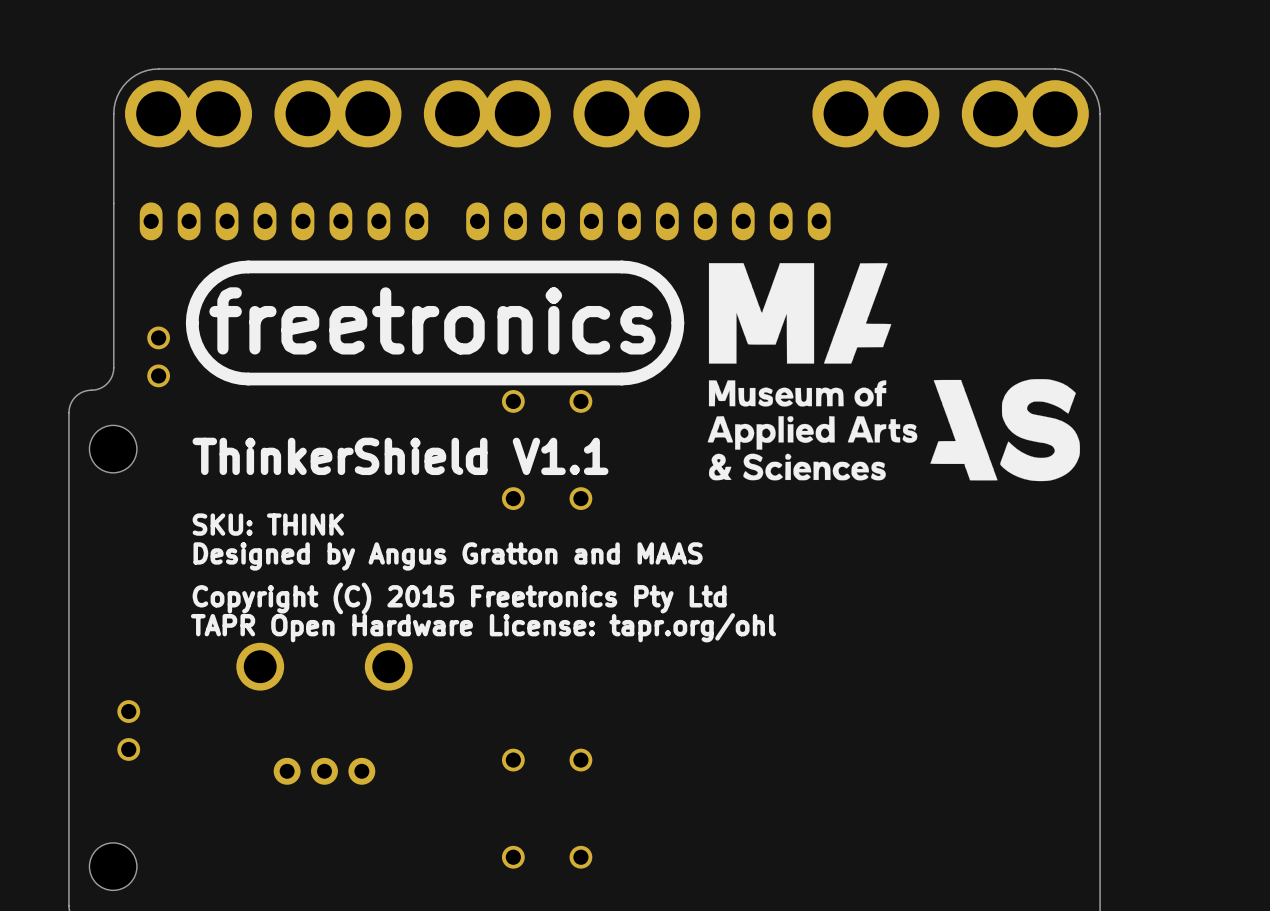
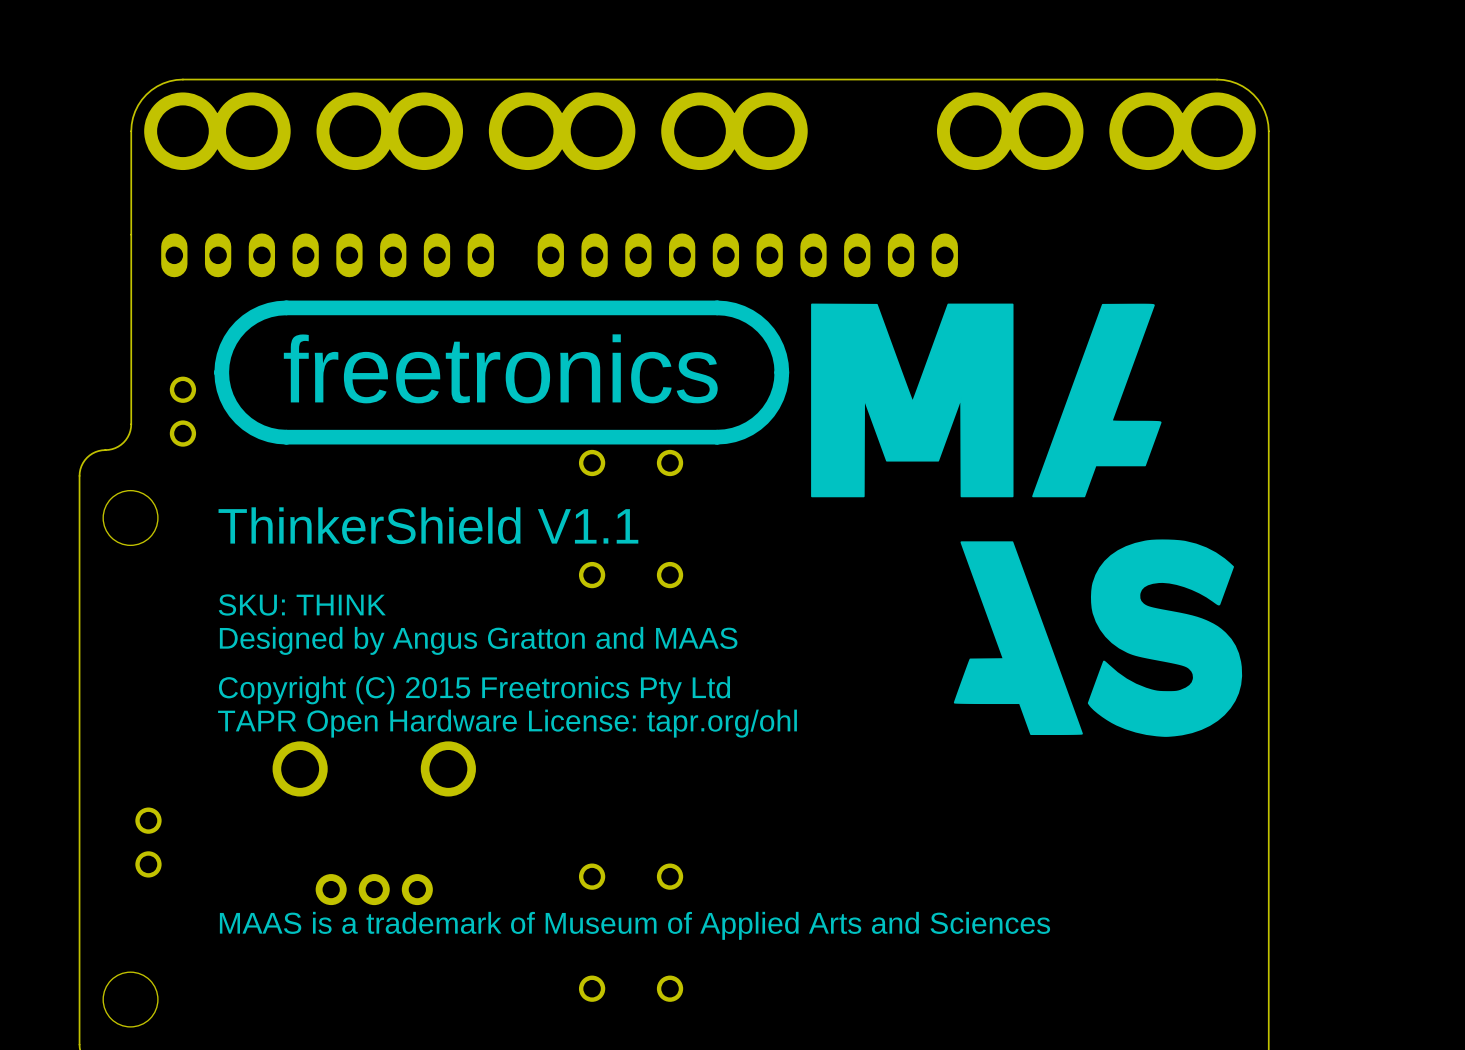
drawing: none -> [811, 303, 1243, 737]
drawing: [707, 263, 1080, 482] -> none
text: none -> MAAS is a trademark of Museum of Applied Arts and Sciences (634, 925)

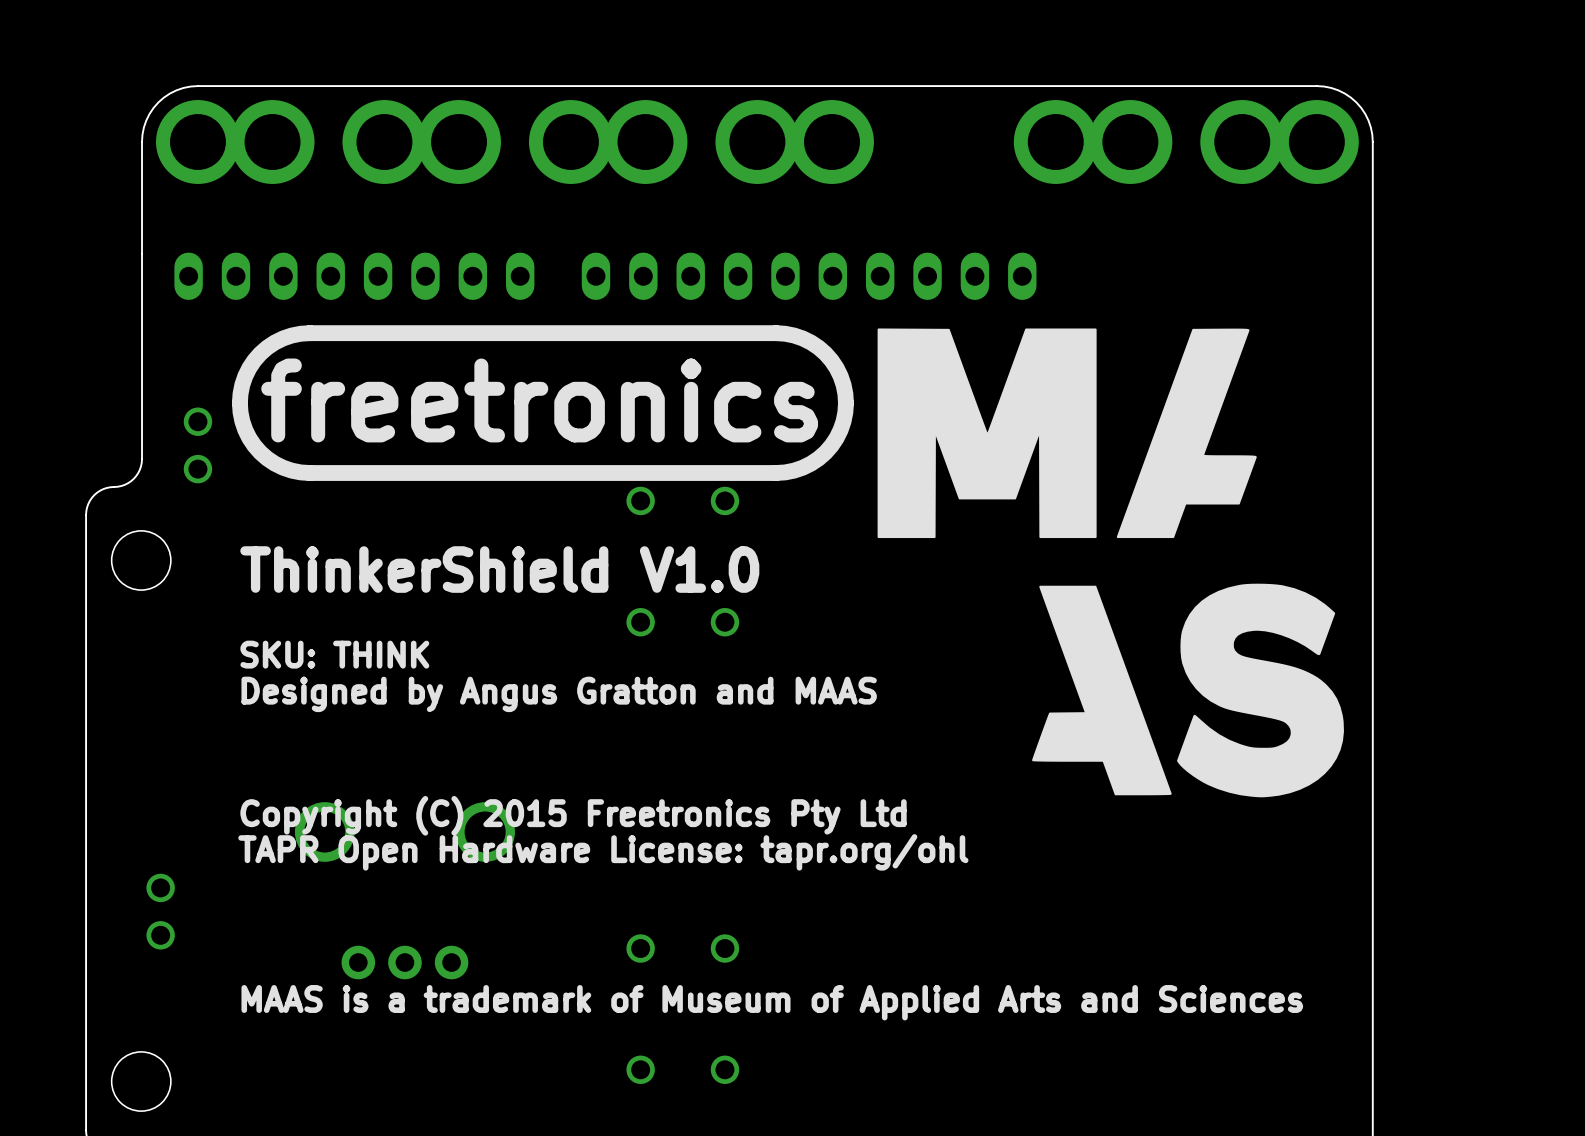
text: ThinkerShield V1.1 (428, 525) -> ThinkerShield V1.0 (499, 569)
text position: Copyright (C) 2015 Freetronics Pty Ltd (474, 690) -> Copyright (C) 2015 Freetronics Pty Ltd (573, 815)
text position: TAPR Open Hardware License: tapr.org/ohl (507, 723) -> TAPR Open Hardware License: tapr.org/ohl (603, 852)

